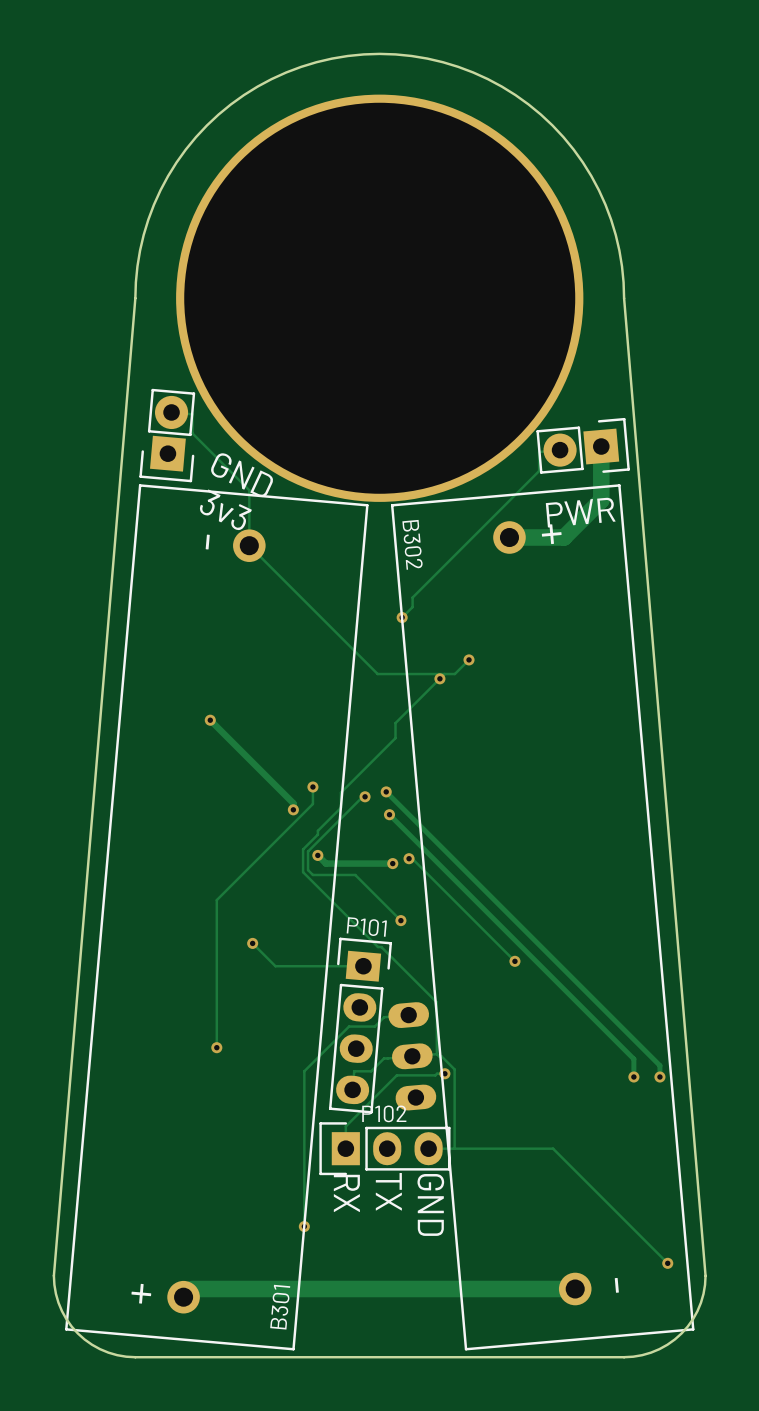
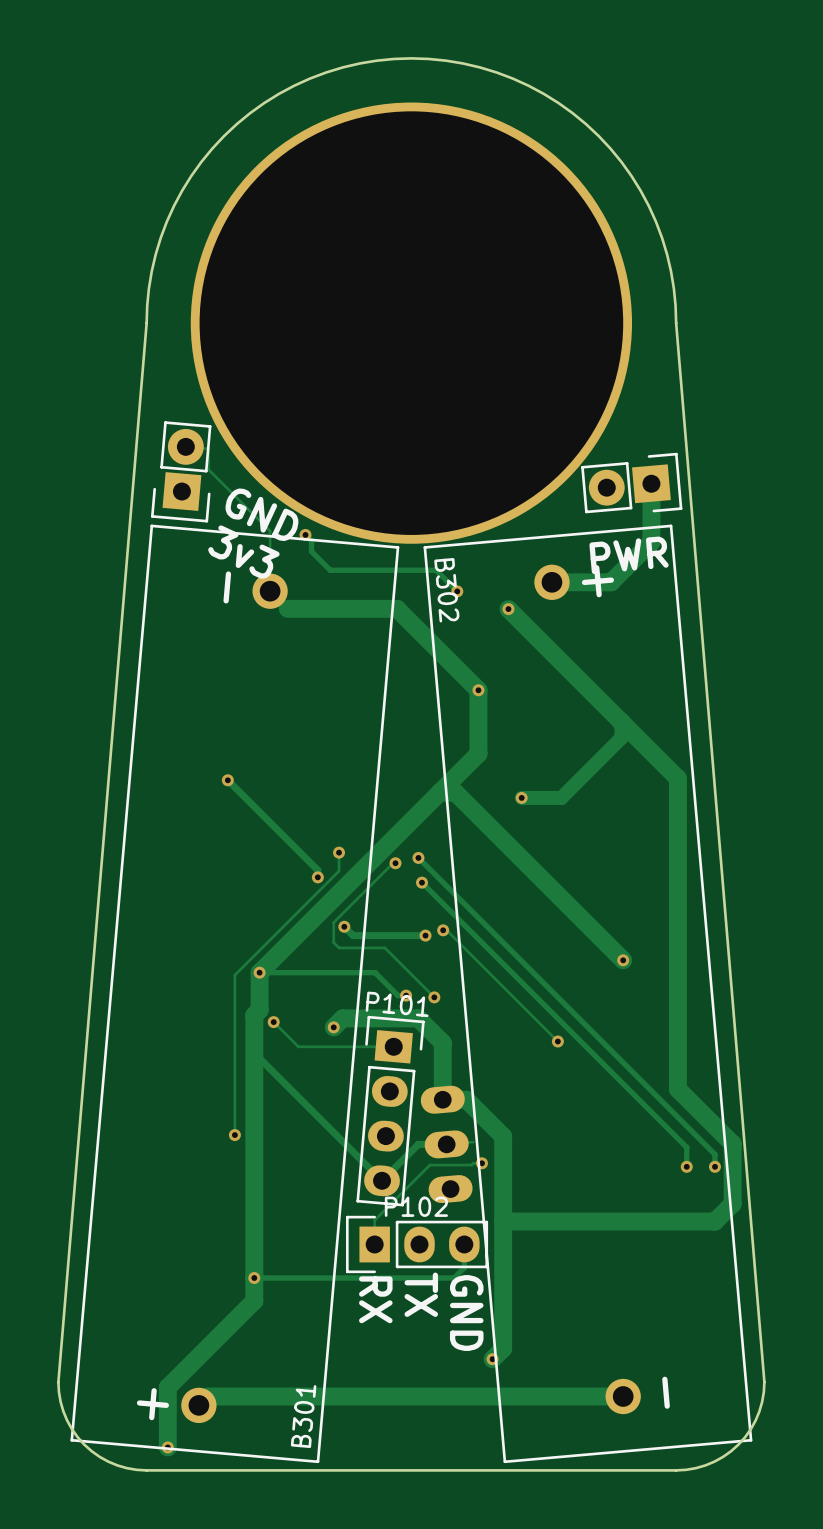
track: (560, 450) (539, 451) (539, 471) (412, 597) (412, 607) (402, 617) -> none
track: none -> (305, 534) (311, 540) (311, 551) (330, 570) (436, 570) (457, 591)
via: none -> (305, 534)
via: none -> (457, 591)
track: (265, 561) (377, 674) (454, 674) (469, 659) -> (287, 608) (397, 608) (478, 690) (478, 753) (259, 972)
track: none -> (508, 609) (677, 778) (677, 1089) (732, 1143) (732, 1203) (714, 1221) (503, 1221)
via: none -> (508, 609)
via: (402, 617) -> none
via: none -> (478, 690)
via: (469, 659) -> none
track: none -> (621, 722) (621, 737) (561, 797) (521, 797)
track: (444, 674) (395, 723) (395, 738) (340, 792) (340, 807) (317, 830) (317, 834) (303, 849) (303, 872) (436, 1002) (436, 1054) (454, 1069) (454, 1148) -> none
via: (439, 678) -> none
track: none -> (439, 792) (455, 792) (623, 960)
via: none -> (521, 797)
via: none -> (623, 960)
track: none -> (259, 972) (375, 972) (397, 995) (406, 995)
track: none -> (259, 972) (259, 1010) (254, 1015) (254, 1300) (167, 1387) (167, 1447)
track: none -> (259, 972) (259, 1058) (382, 1180) (418, 1144) (446, 1144)
via: none -> (259, 972)
via: none -> (406, 995)
track: none -> (333, 1027) (342, 1018) (418, 1018) (442, 1042) (442, 1099) (466, 1099) (503, 1136) (503, 1348) (492, 1359)
via: none -> (333, 1027)
track: (408, 1015) (384, 1017) (374, 1026) (349, 1026) (304, 1071) (304, 1226) -> none
track: (371, 1071) (354, 1071) (352, 1089) -> none
track: (428, 1148) (553, 1148) (667, 1263) -> (464, 1244) (464, 1267) (454, 1278) (254, 1278)
via: none -> (254, 1278)
via: (304, 1226) -> none
via: none -> (492, 1359)
via: (667, 1263) -> none
via: none -> (167, 1447)

